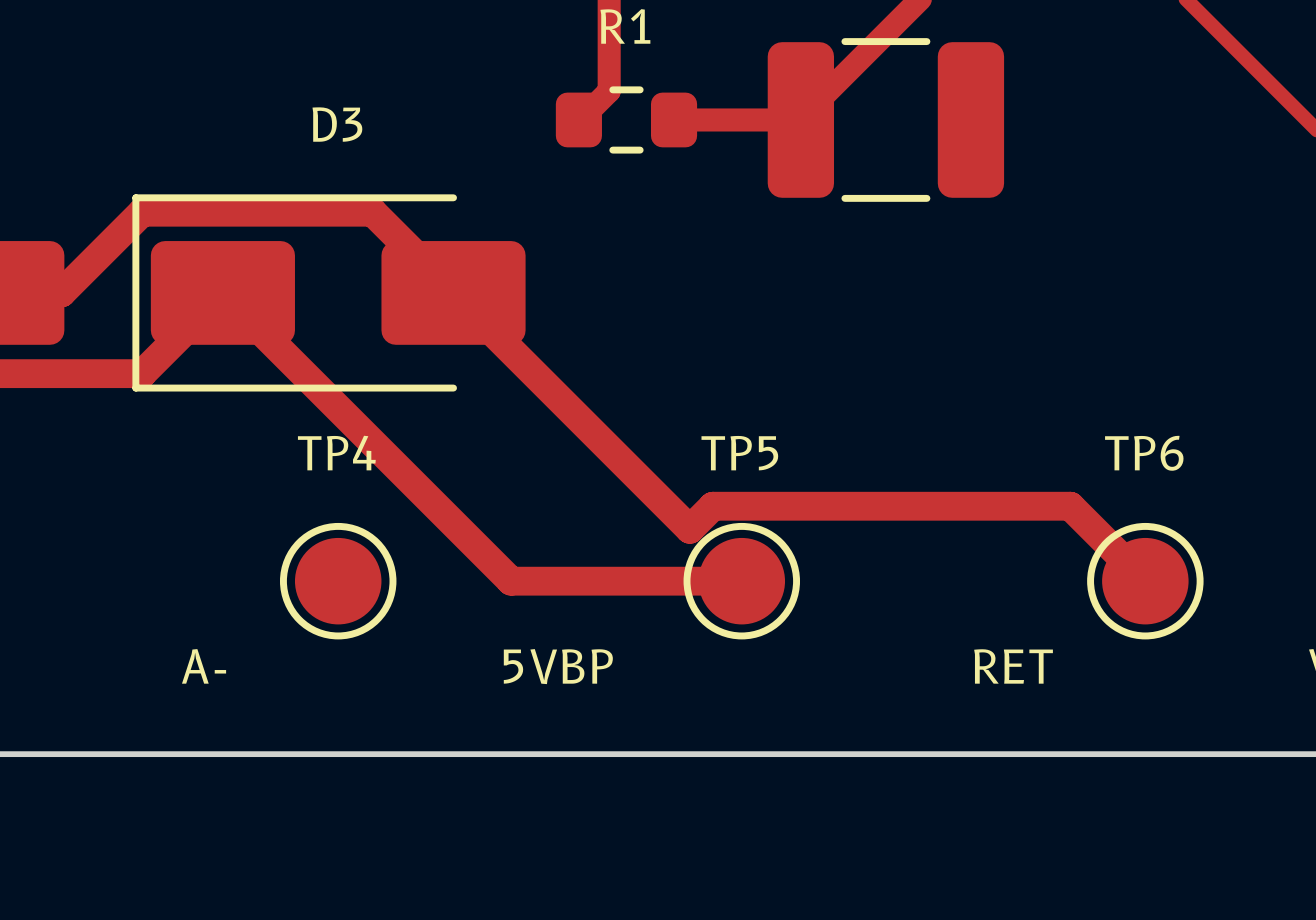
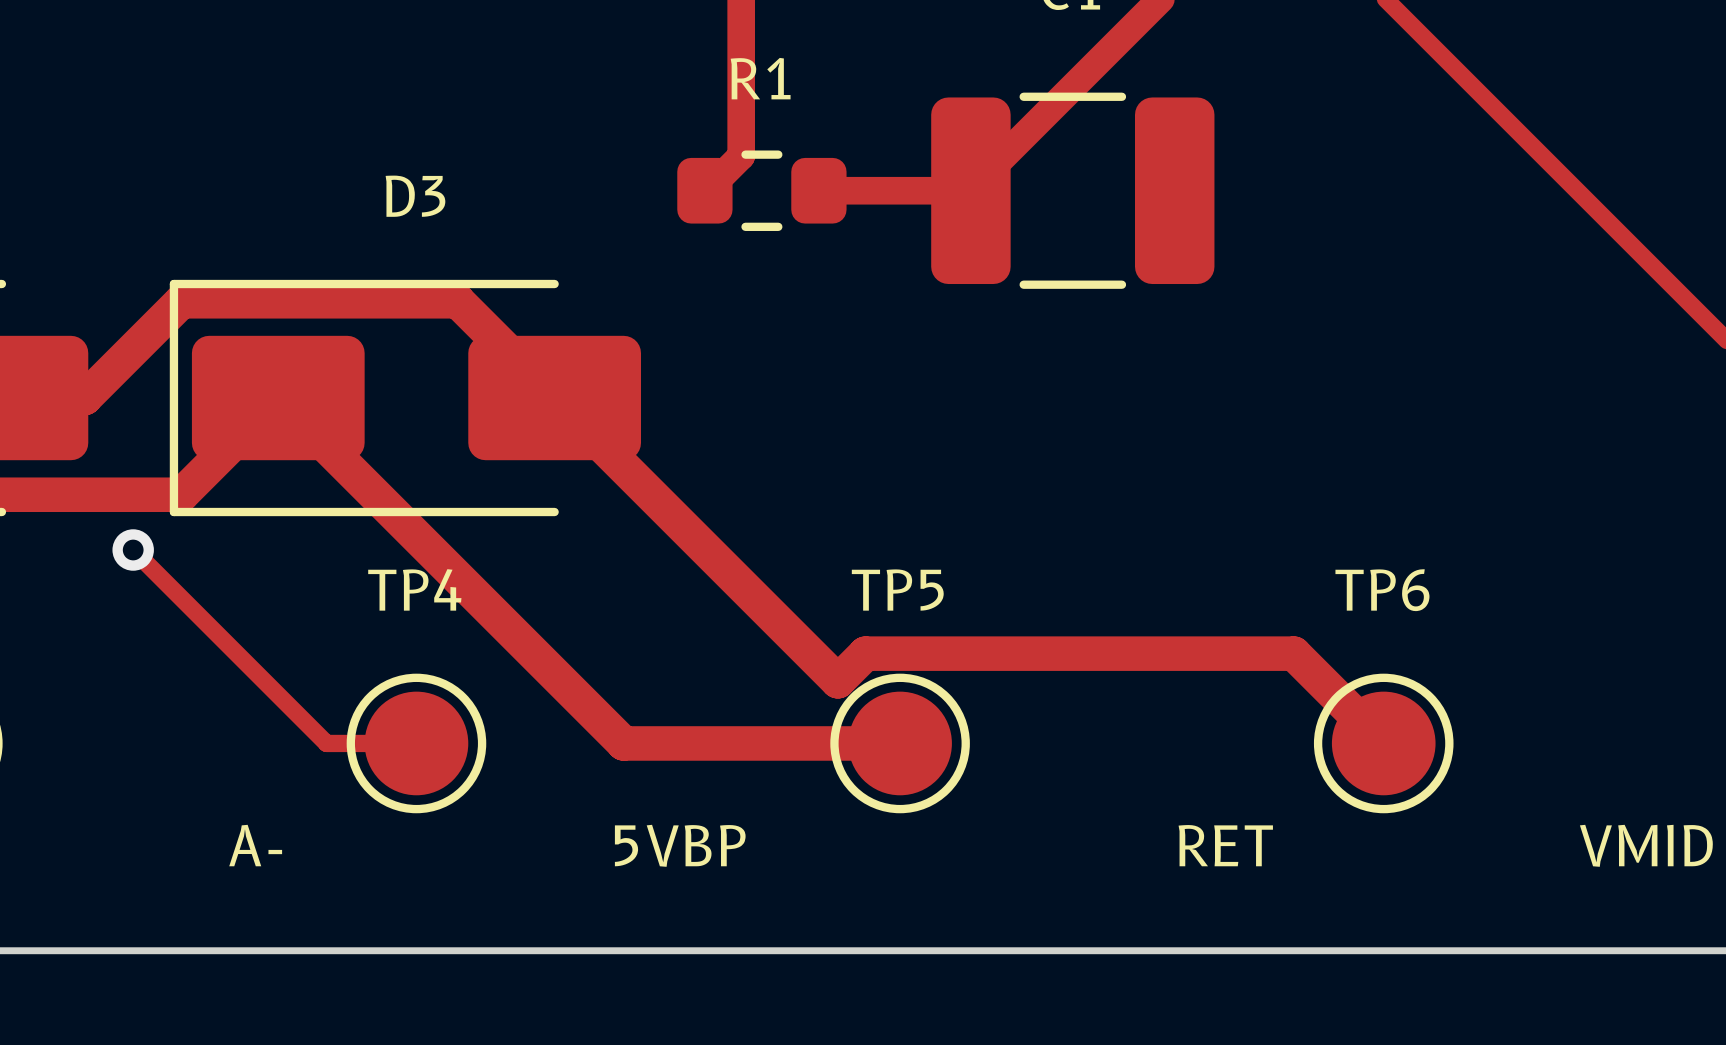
track: none -> (133, 550) (326, 743) (416, 743)
via: none -> (133, 550)

